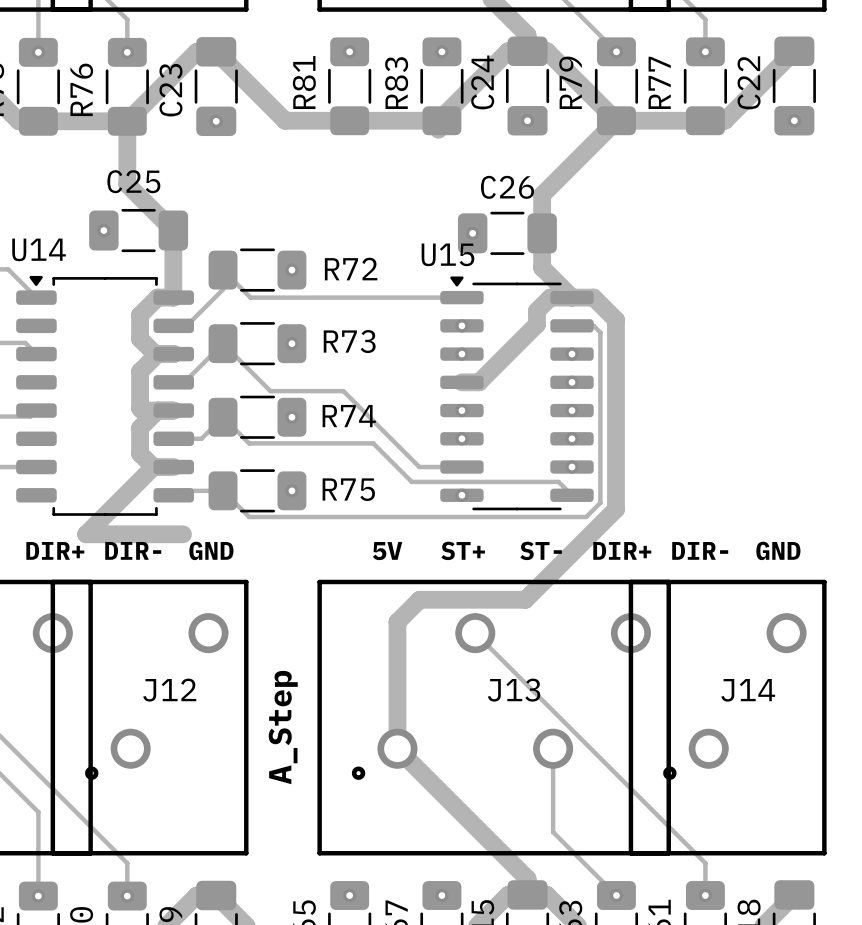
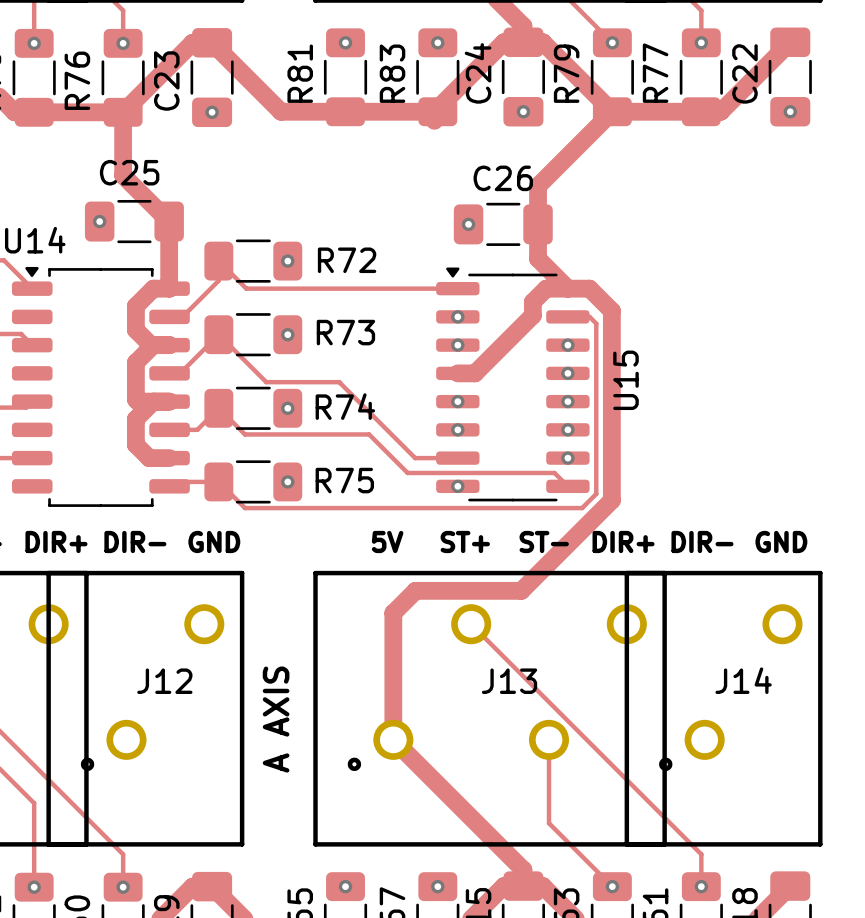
U15 name rotation: 0° (447, 254) -> 90° counterclockwise (626, 380)
U15 name position: U15 (447, 254) -> U15 (626, 380)
track: (153, 467) (86, 534) (183, 534) -> none
text: A_Step (283, 727) -> A AXIS (276, 719)

